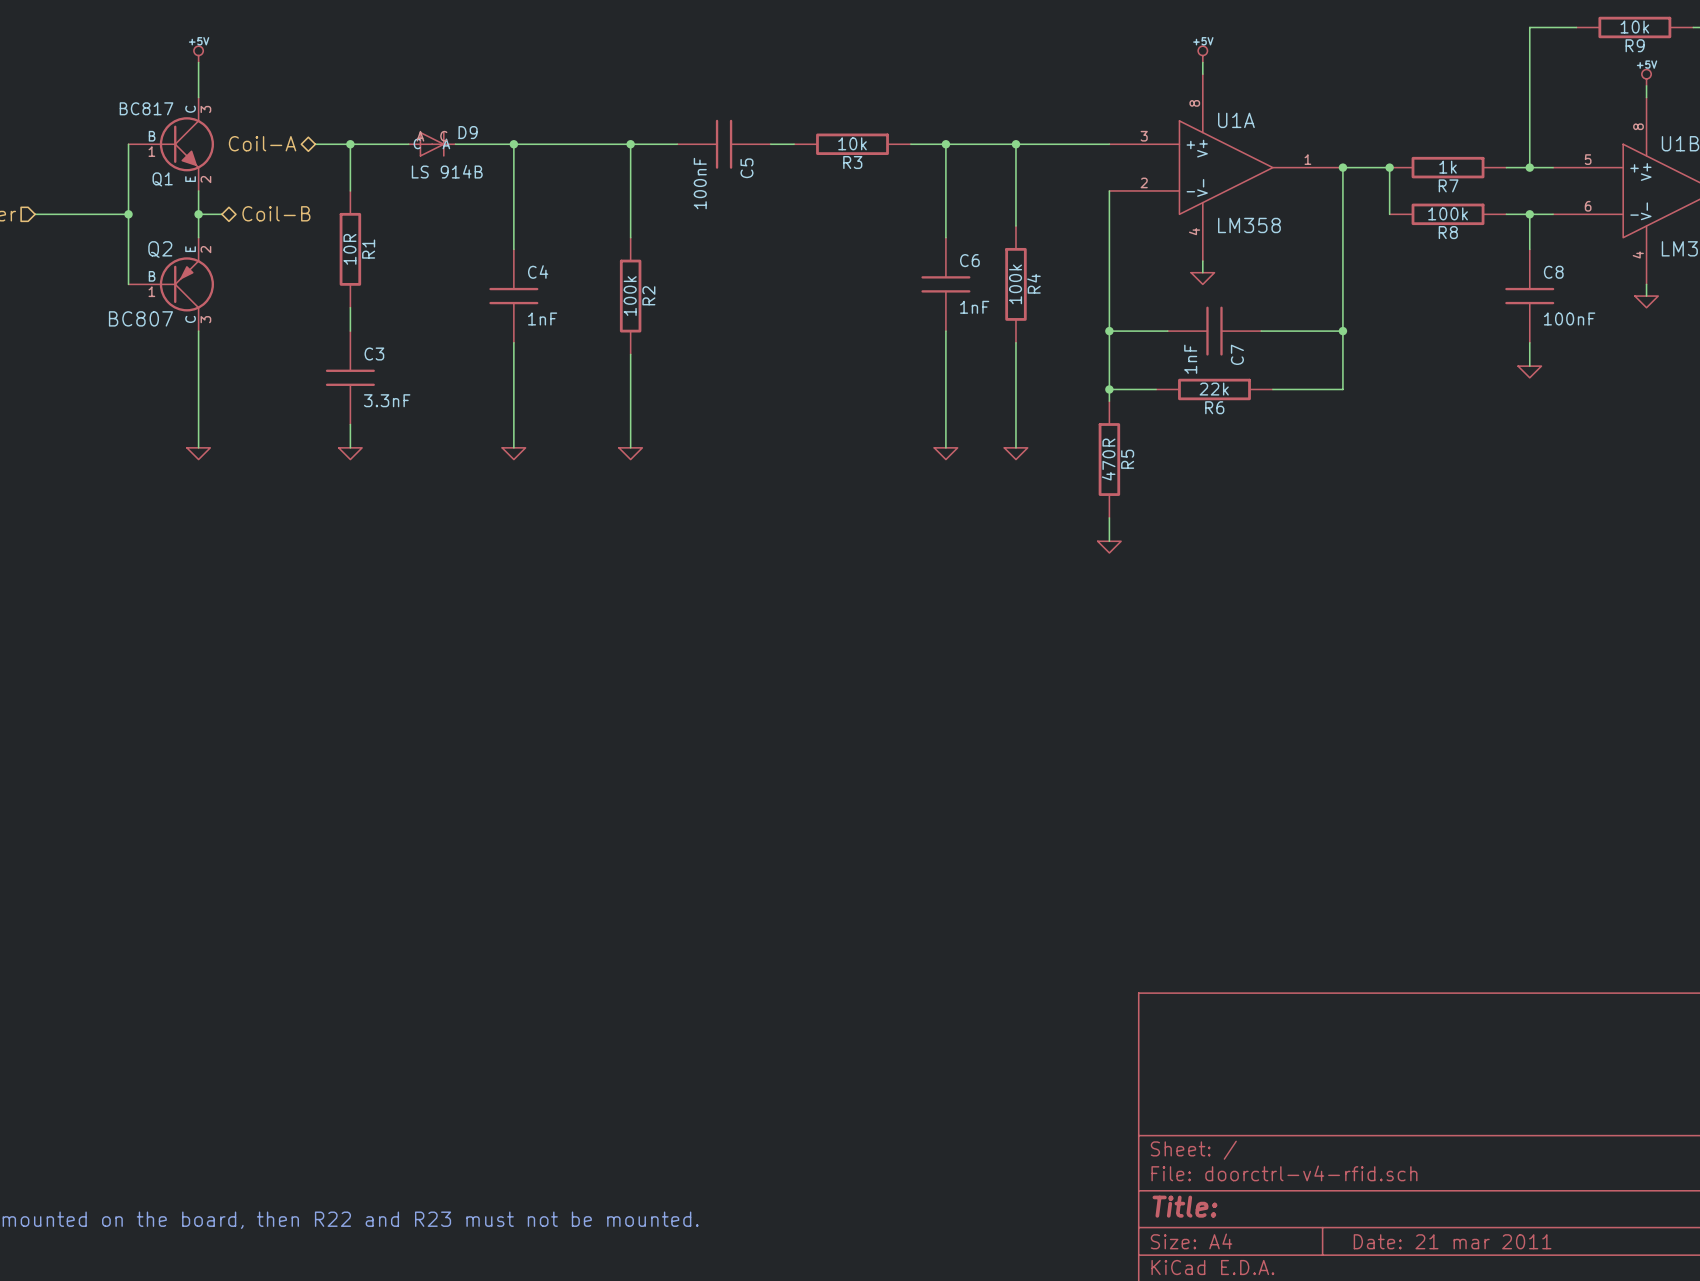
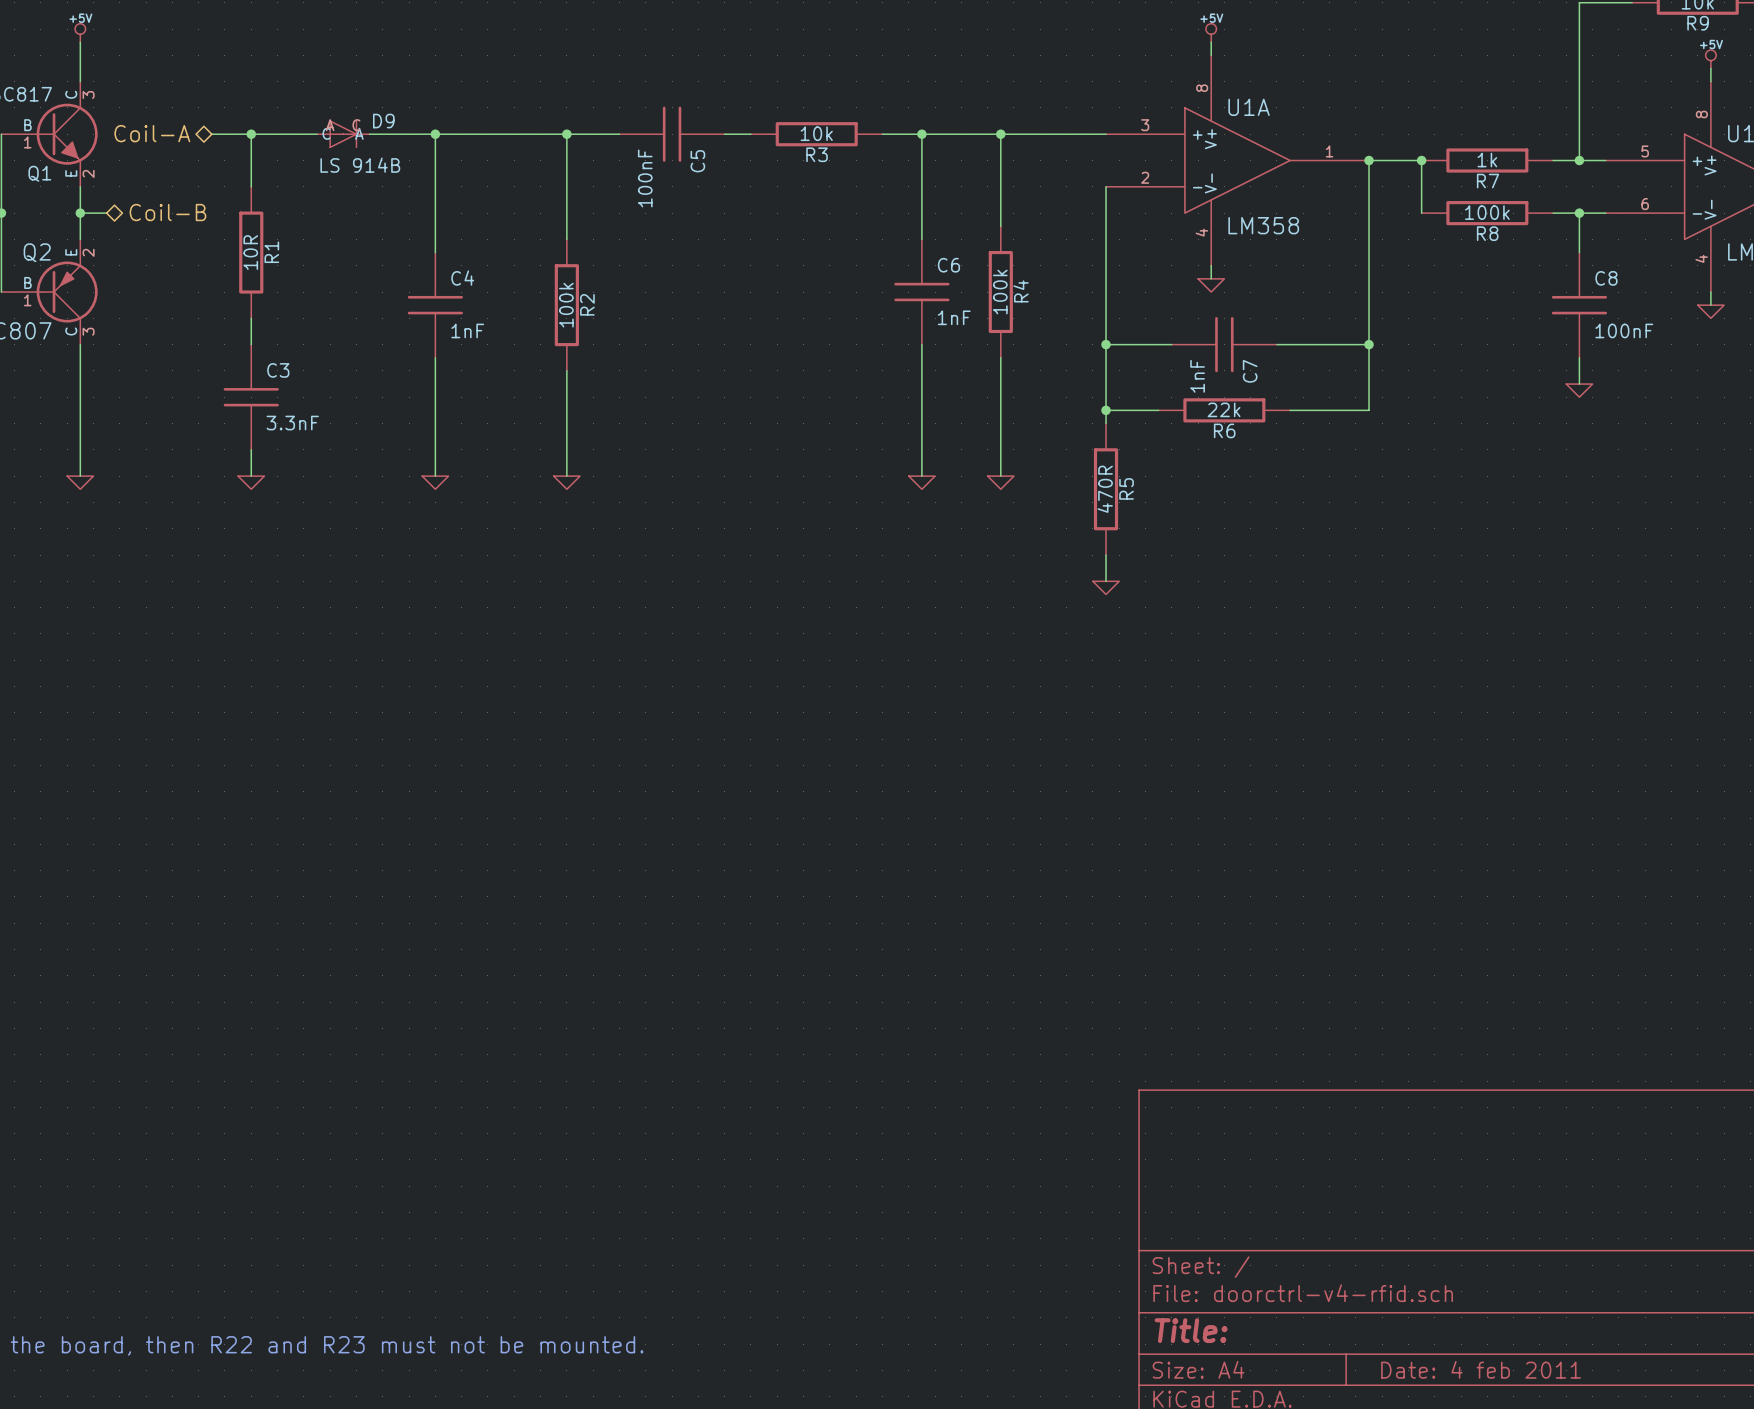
title block: Date: 21 mar 2011 (1452, 1241) -> Date: 4 feb 2011 (1481, 1369)

